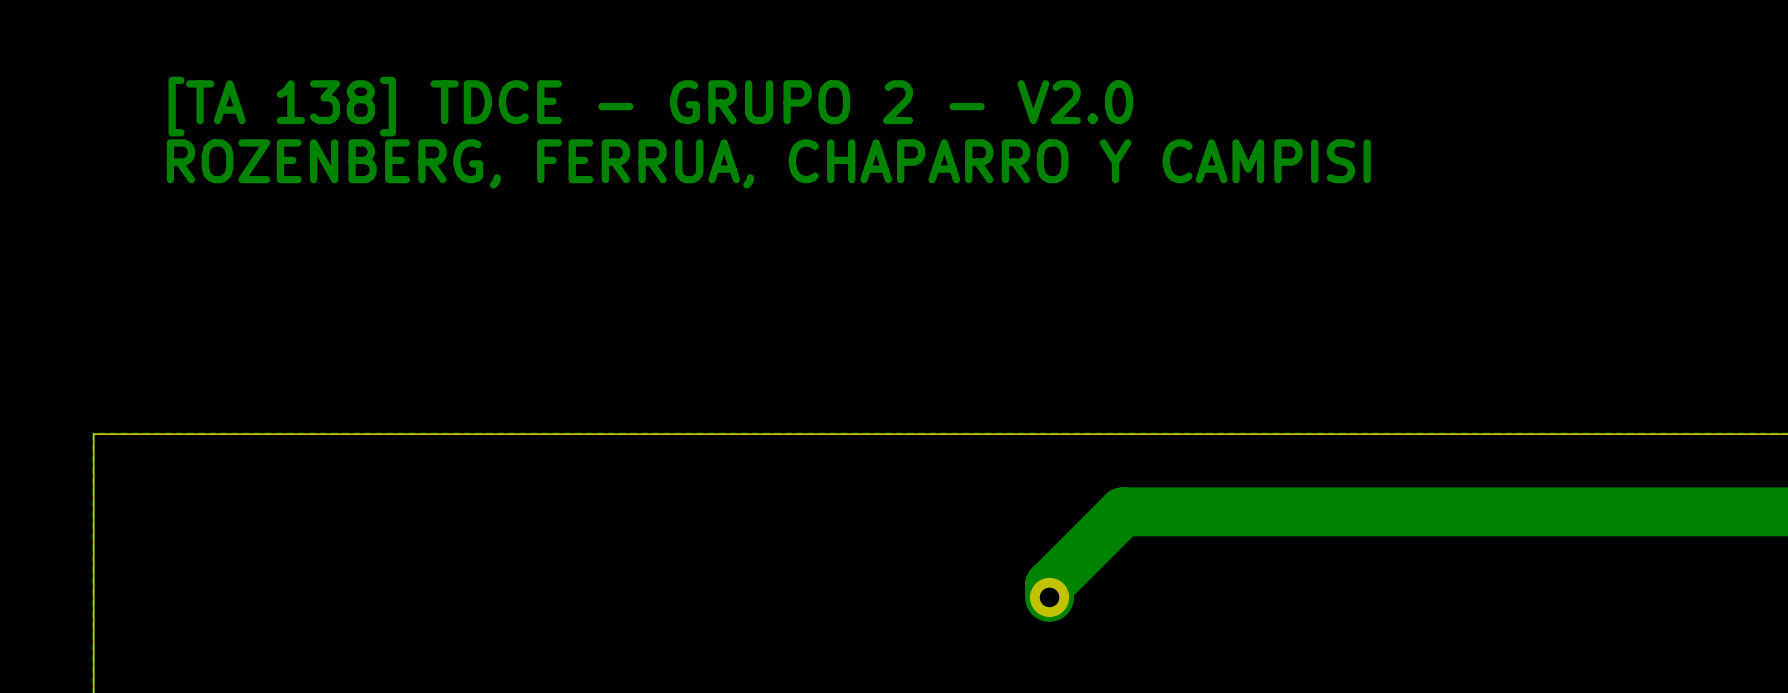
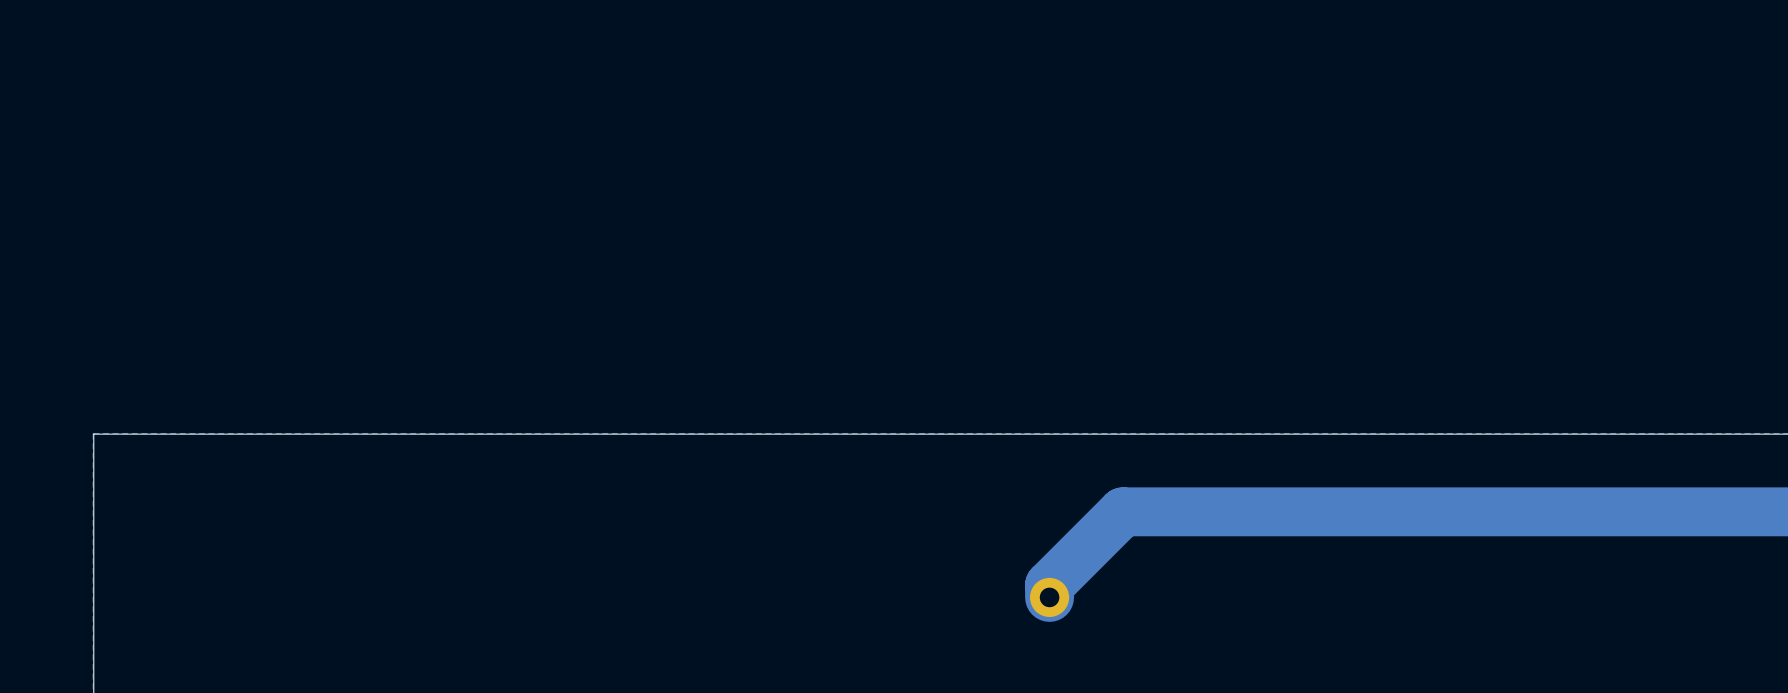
text: [TA 138] TDCE - GRUPO 2 - V2.0 (650, 106) -> none
text: ROZENBERG, FERRUA, CHAPARRO Y CAMPISI (768, 163) -> none

